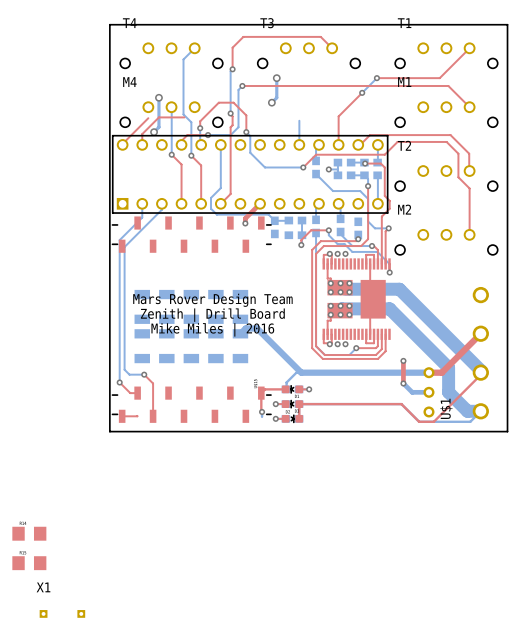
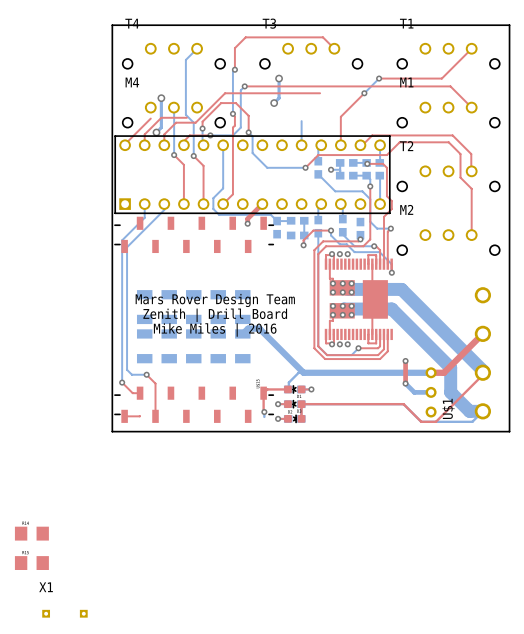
top track: none -> (320, 93) (225, 93) (195, 122) (176, 122) (164, 134) (164, 145)

